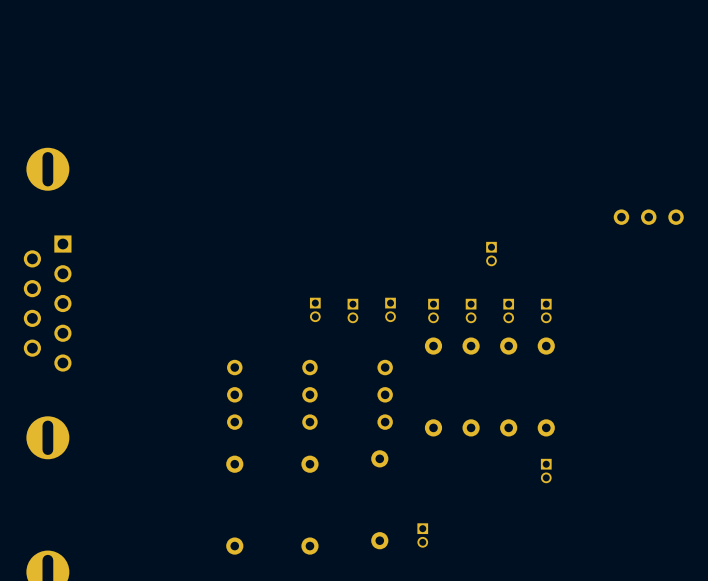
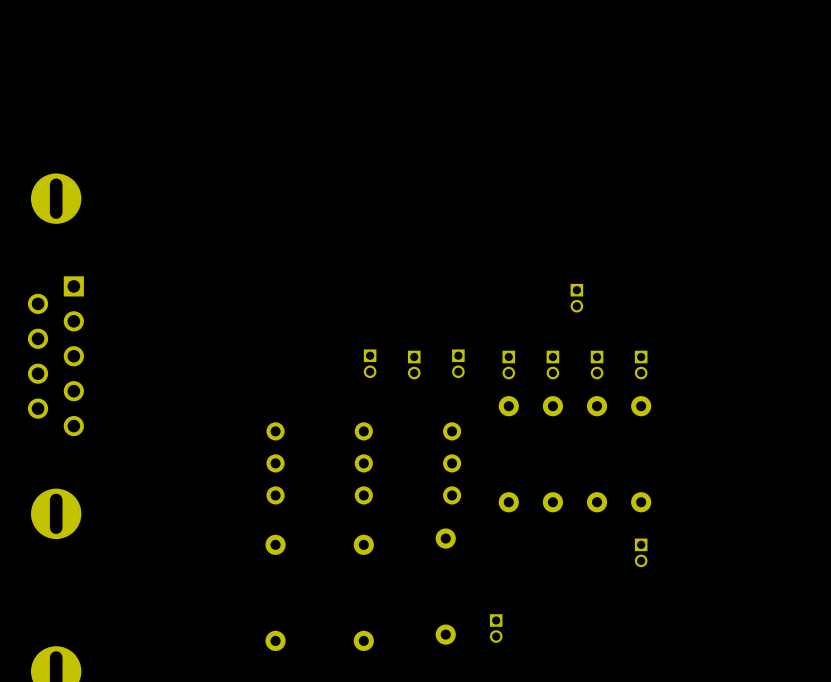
part: (648, 217) -> none

